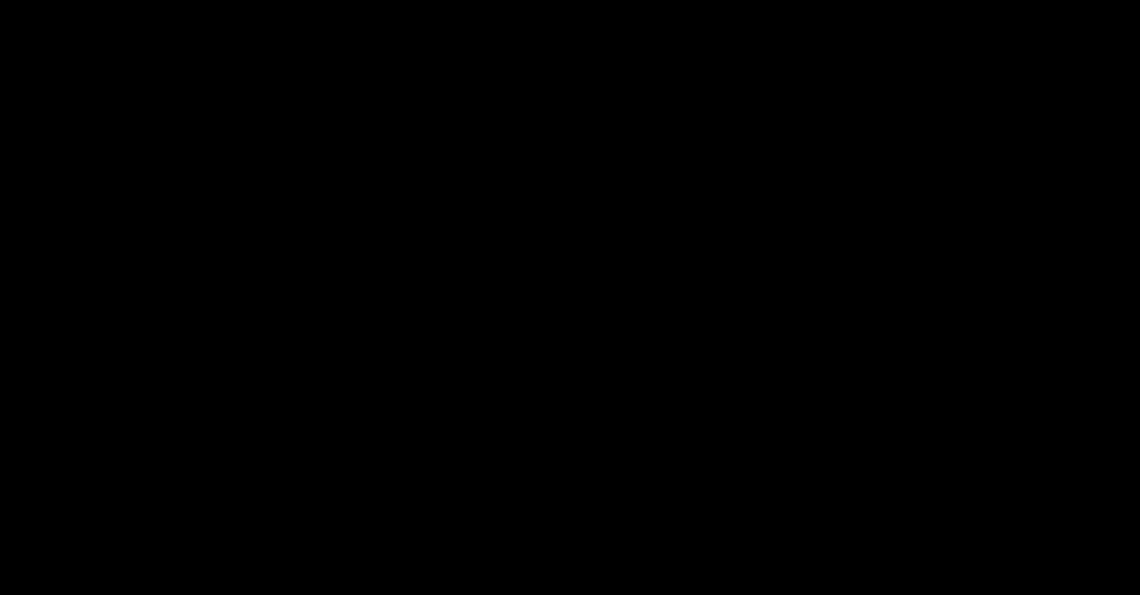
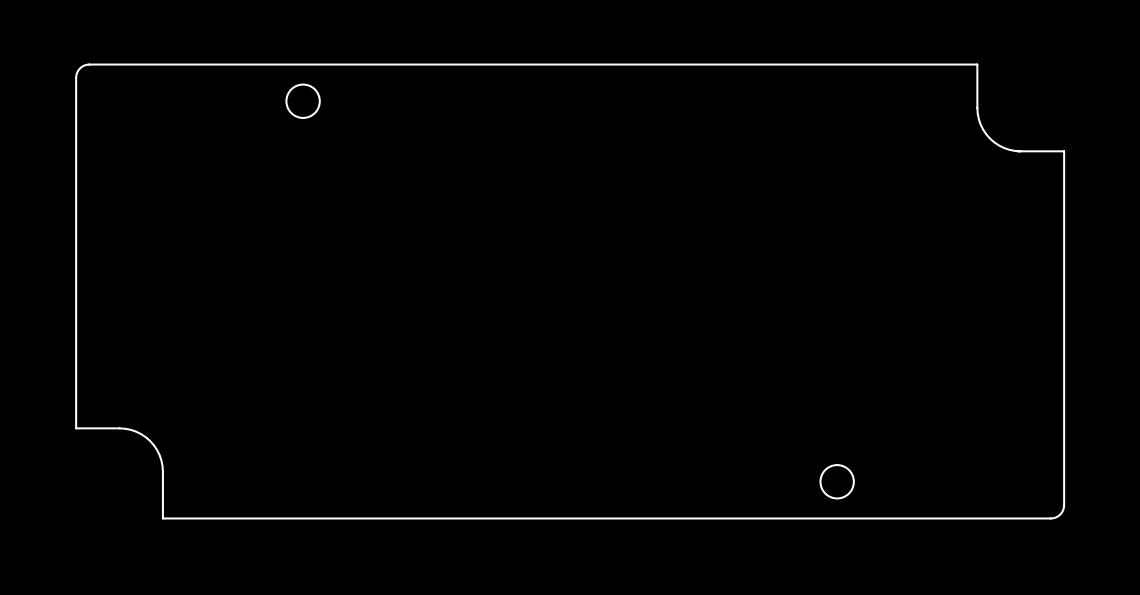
round board edge: none -> [285, 83, 321, 119]
board edge: none -> (1017, 151) (1064, 151) (1064, 505) (1061, 513) (1054, 518) (162, 518) (162, 466) (157, 450) (150, 441) (136, 431) (125, 428) (76, 428) (76, 77) (78, 69) (86, 64) (977, 64) (977, 113) (983, 129) (999, 145) (1009, 149) (1015, 150) (1020, 151)
round board edge: none -> [819, 464, 855, 500]

